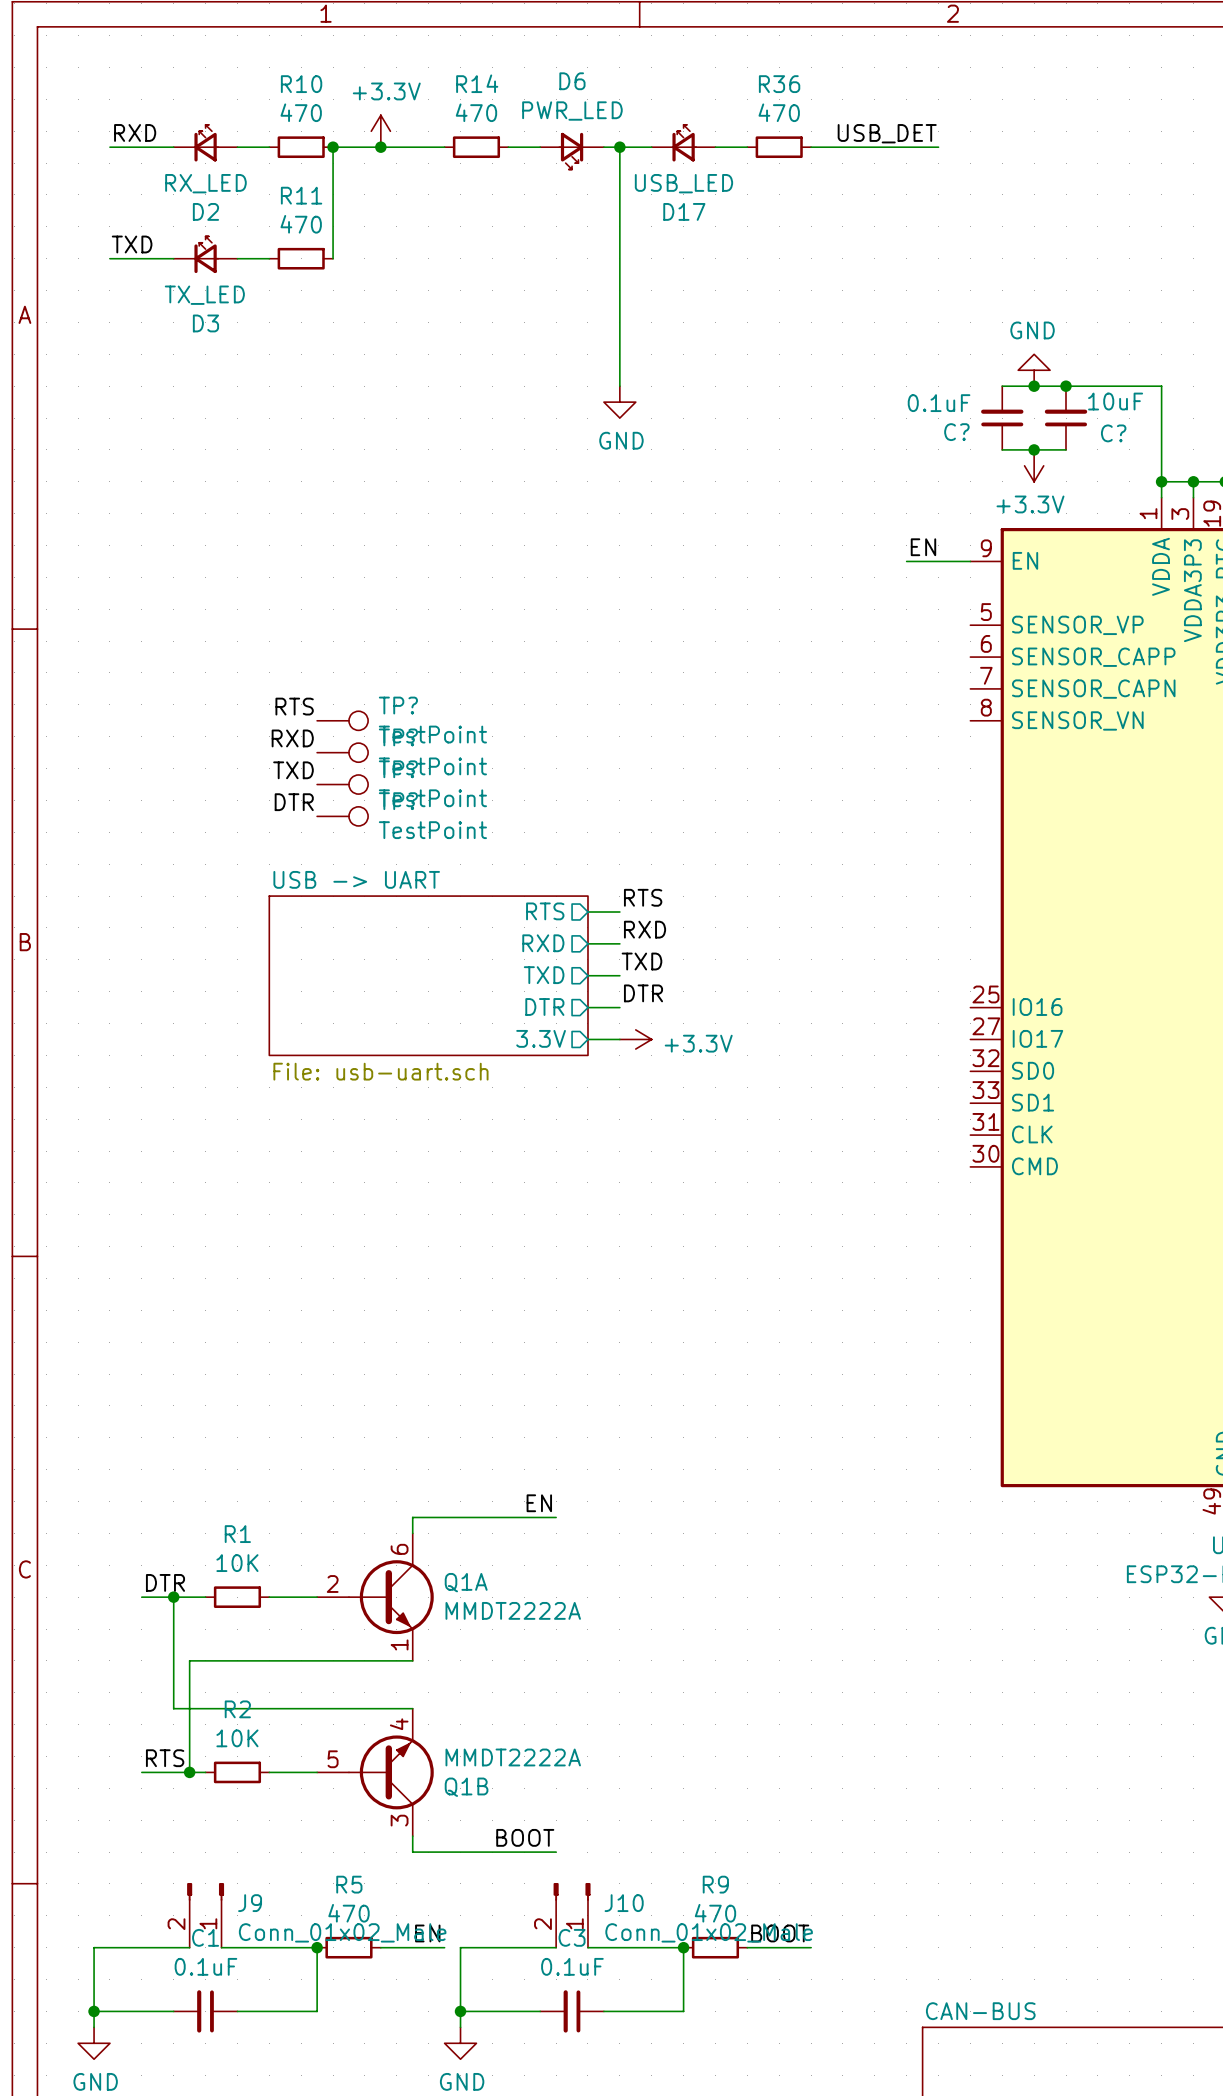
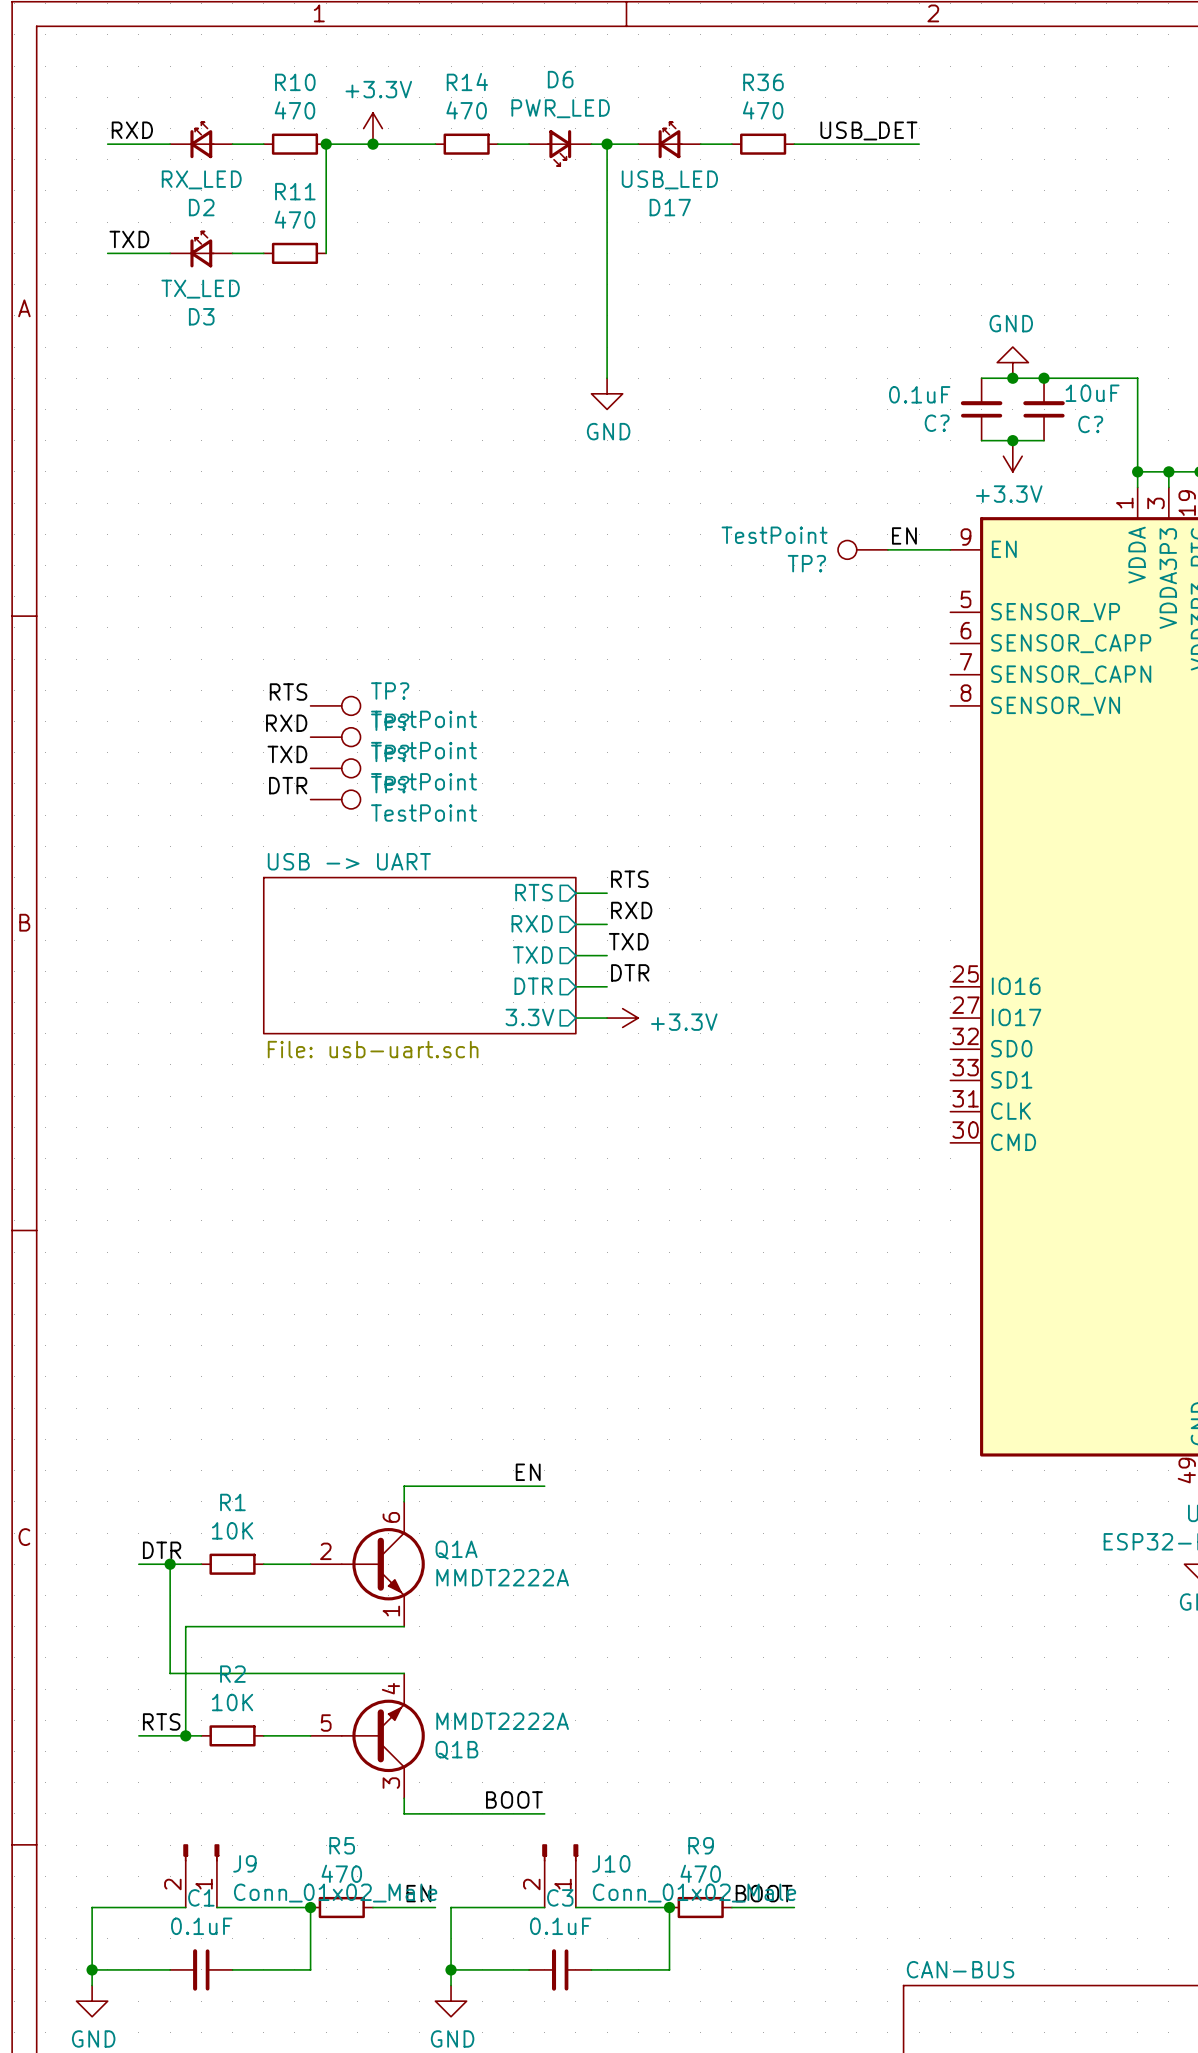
TP?: none -> TestPoint (863, 549)

